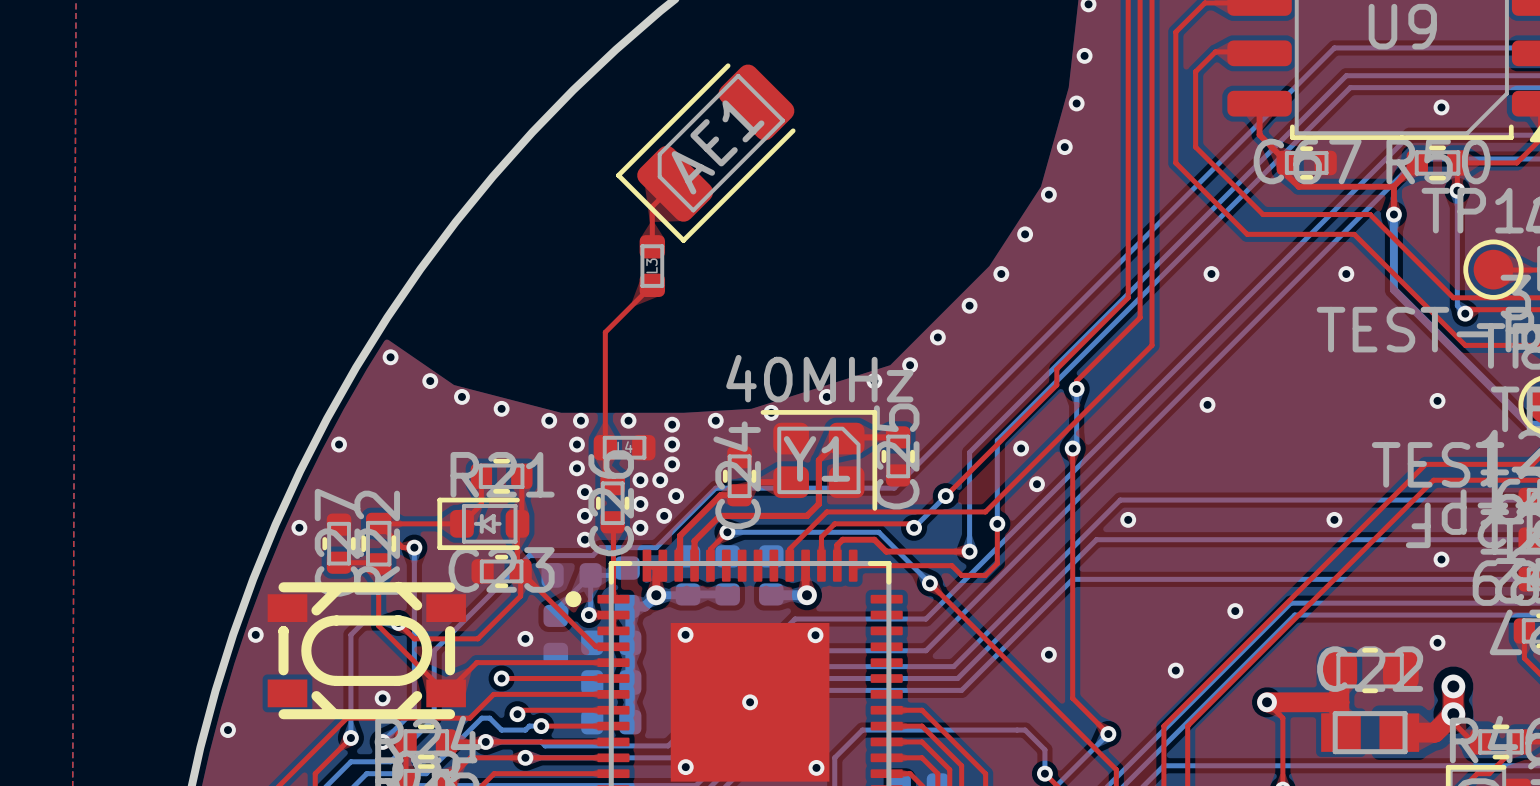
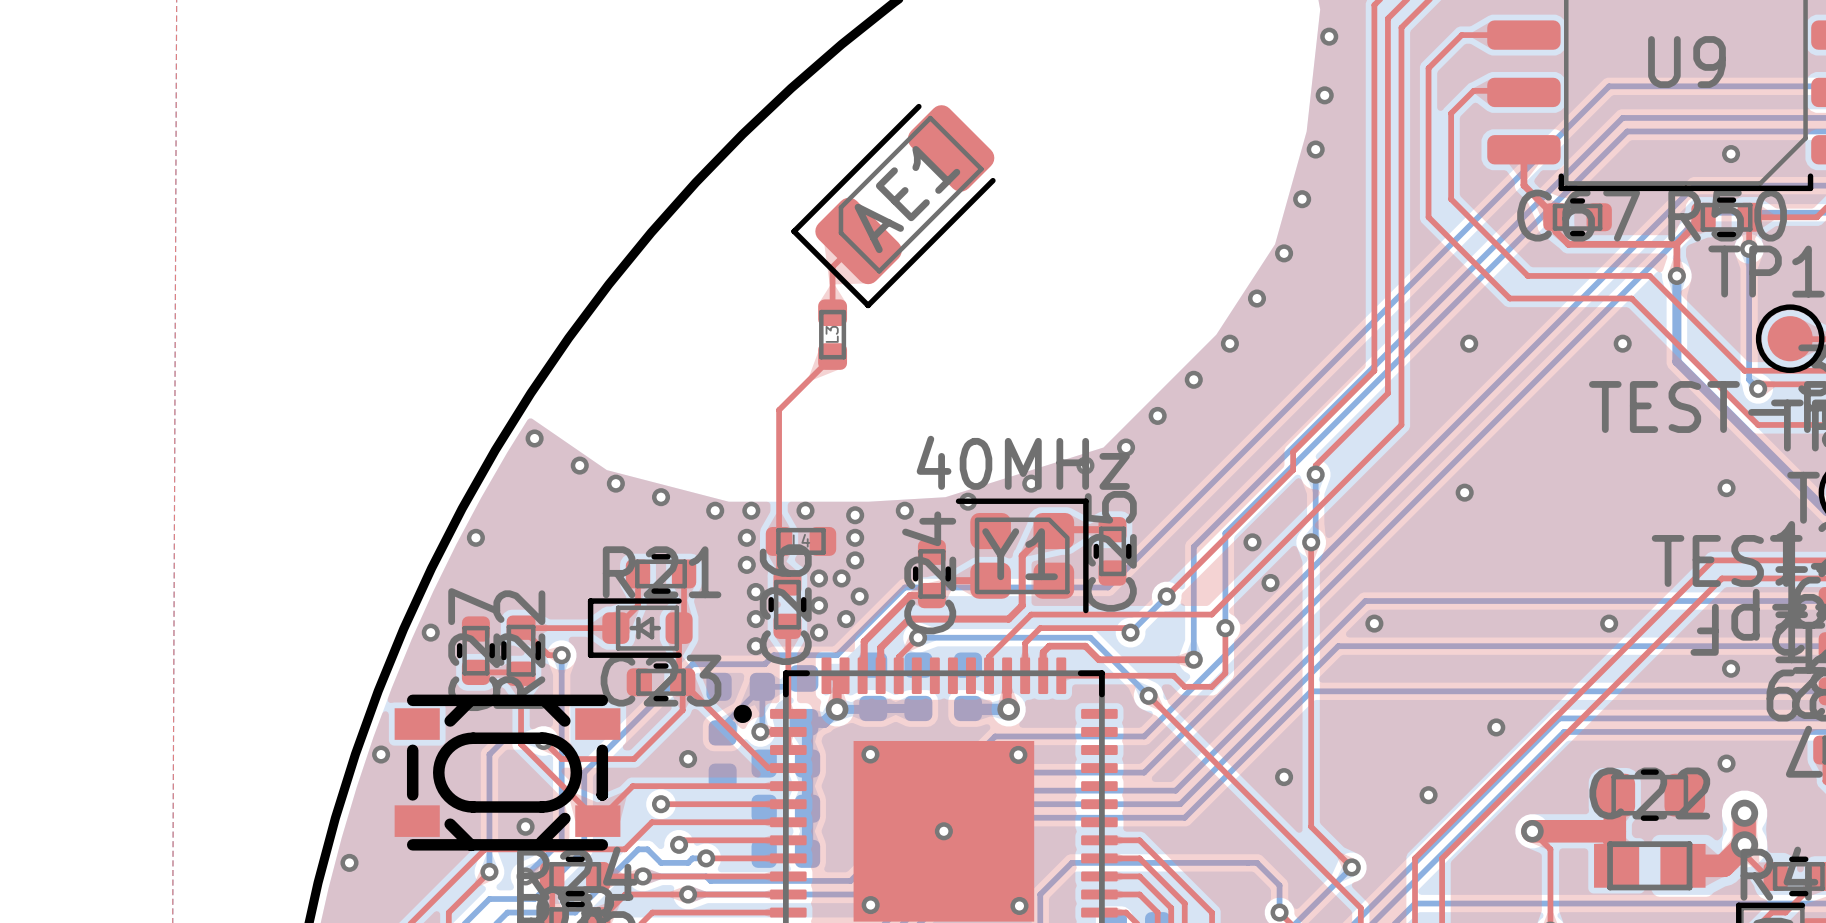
part rotation: 0° (366, 650) -> 180° (507, 772)

